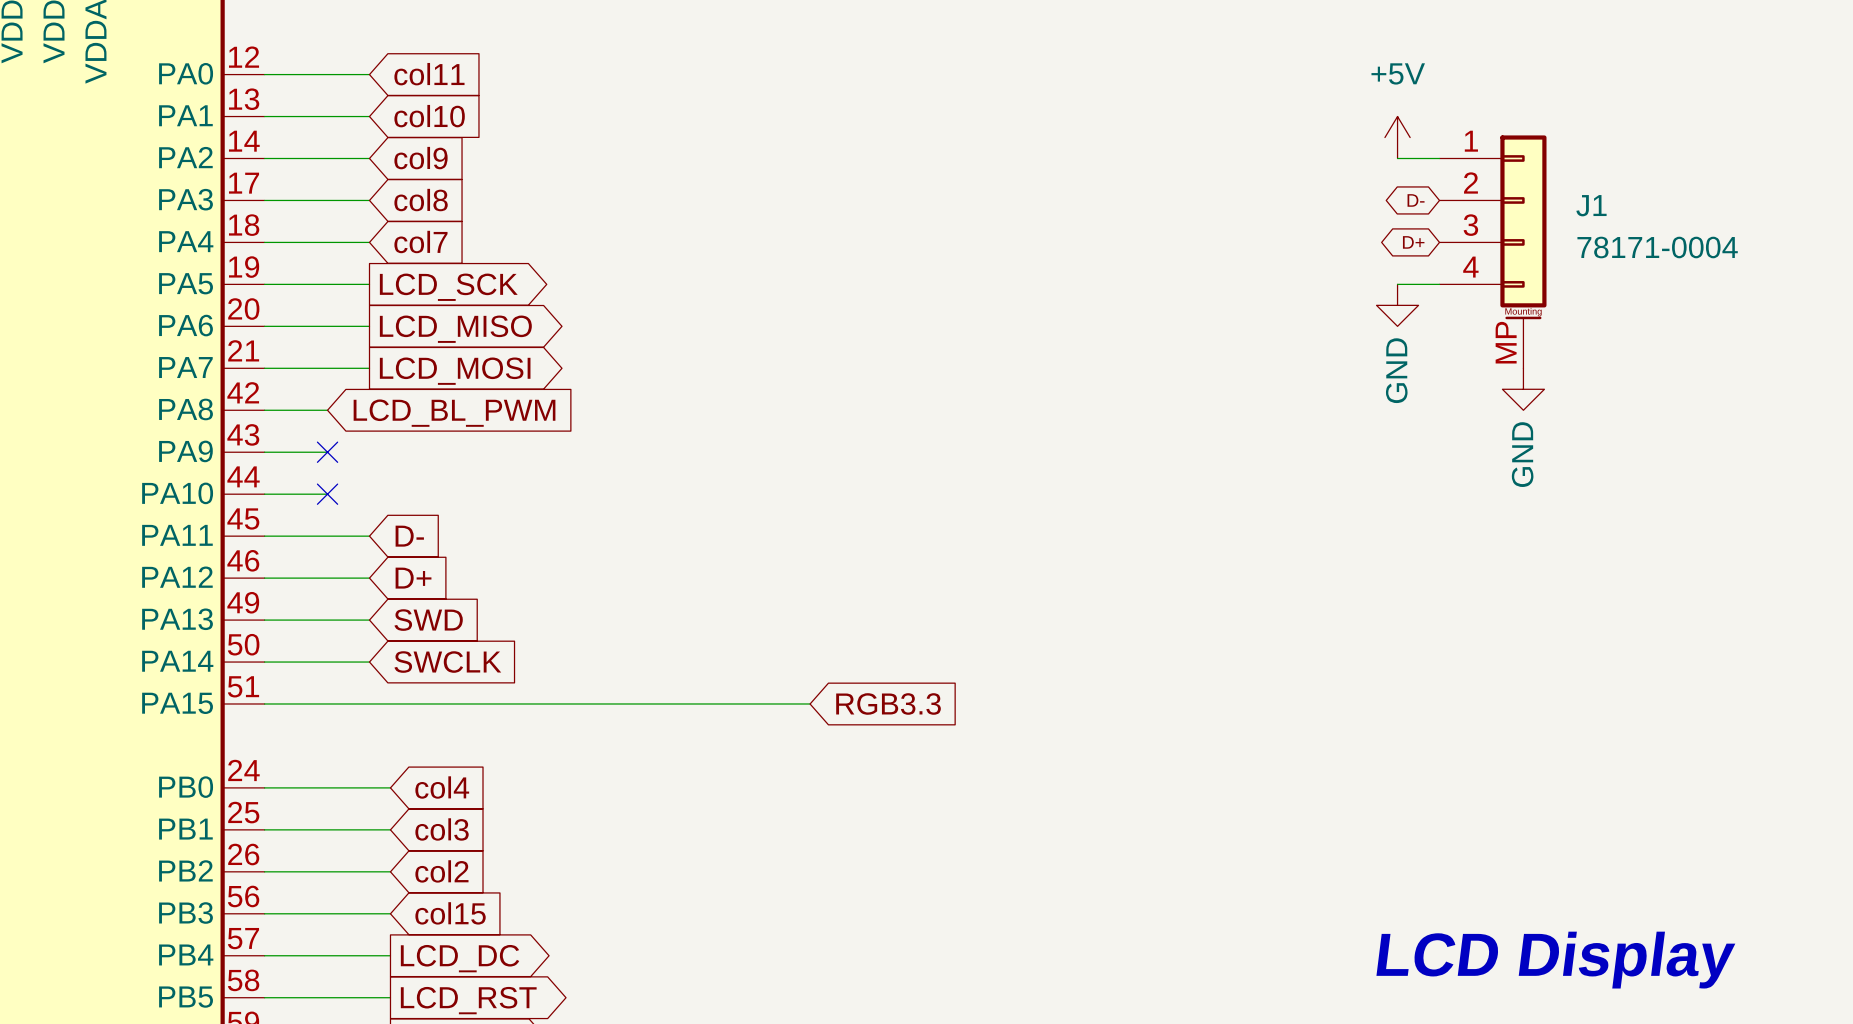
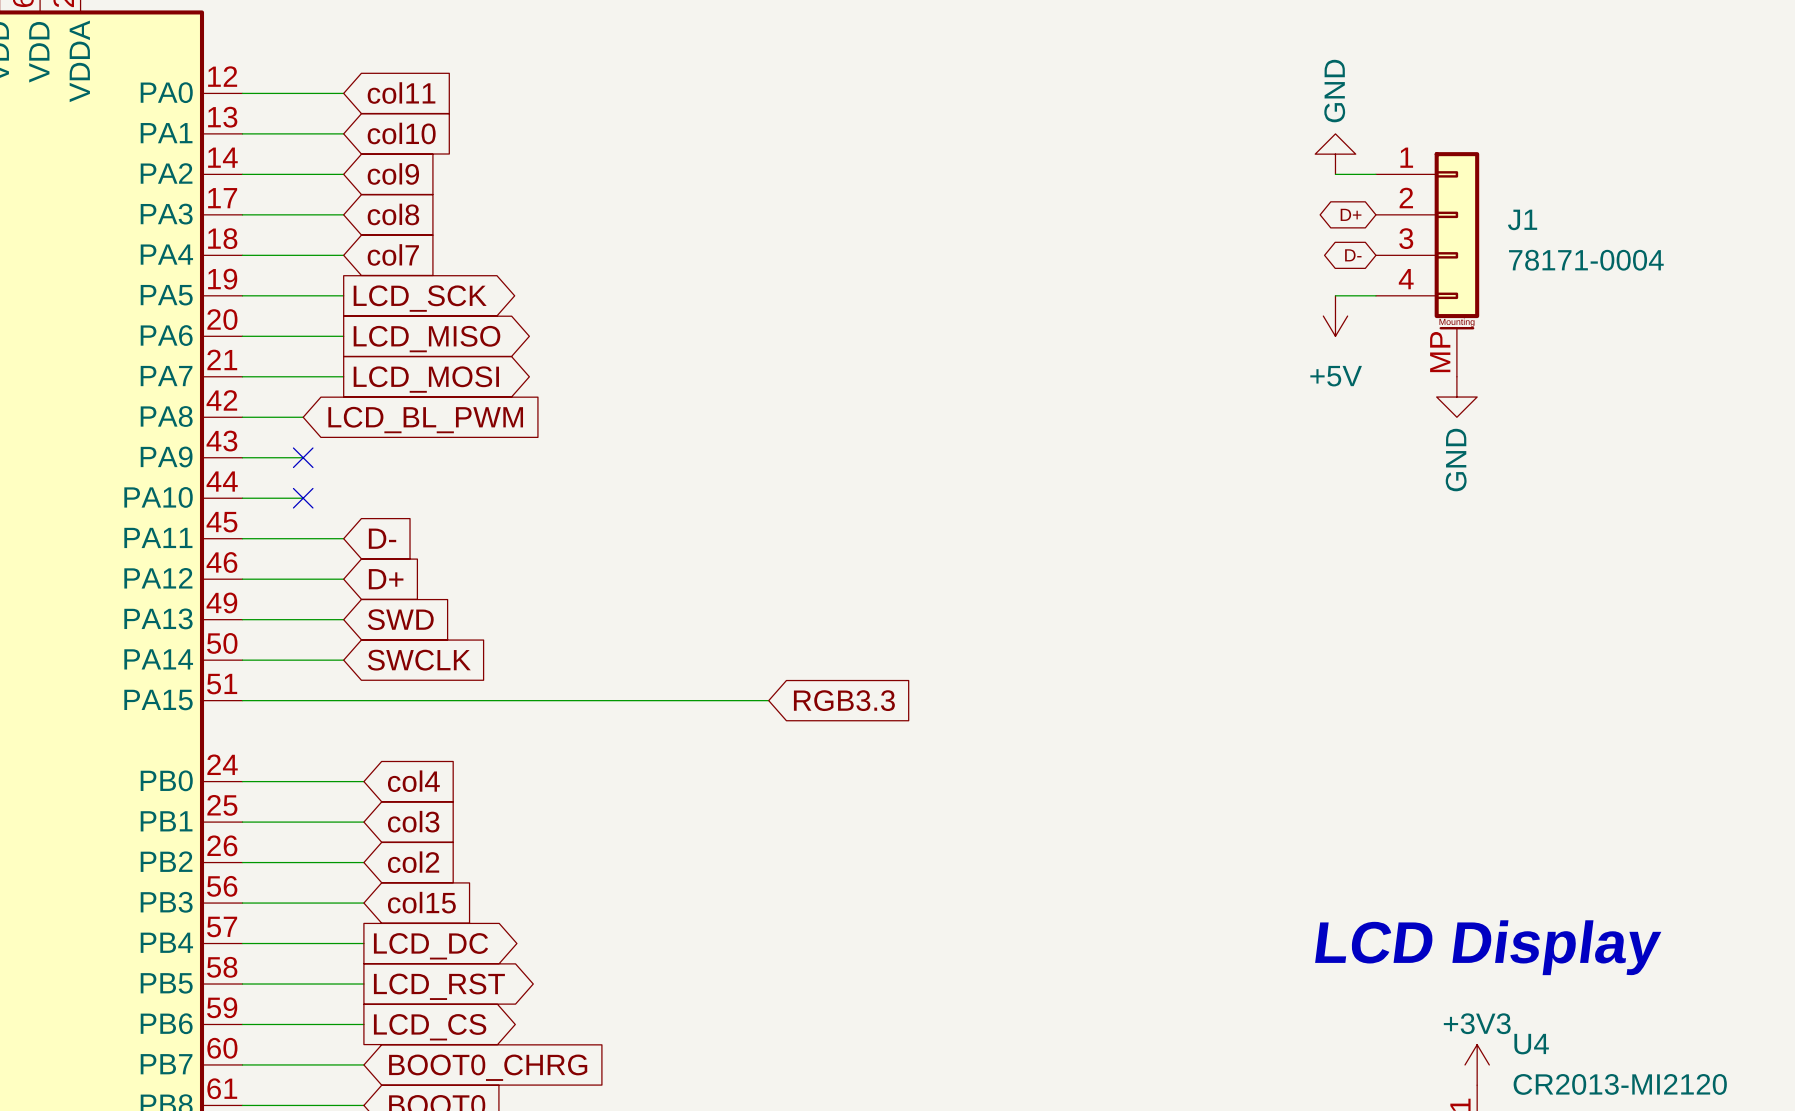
power symbol: +5V (1397, 137) -> GND (1335, 154)
global label: D- (1416, 200) -> D+ (1351, 214)
global label: D+ (1413, 242) -> D- (1353, 255)
power symbol: GND (1397, 305) -> +5V (1335, 316)

